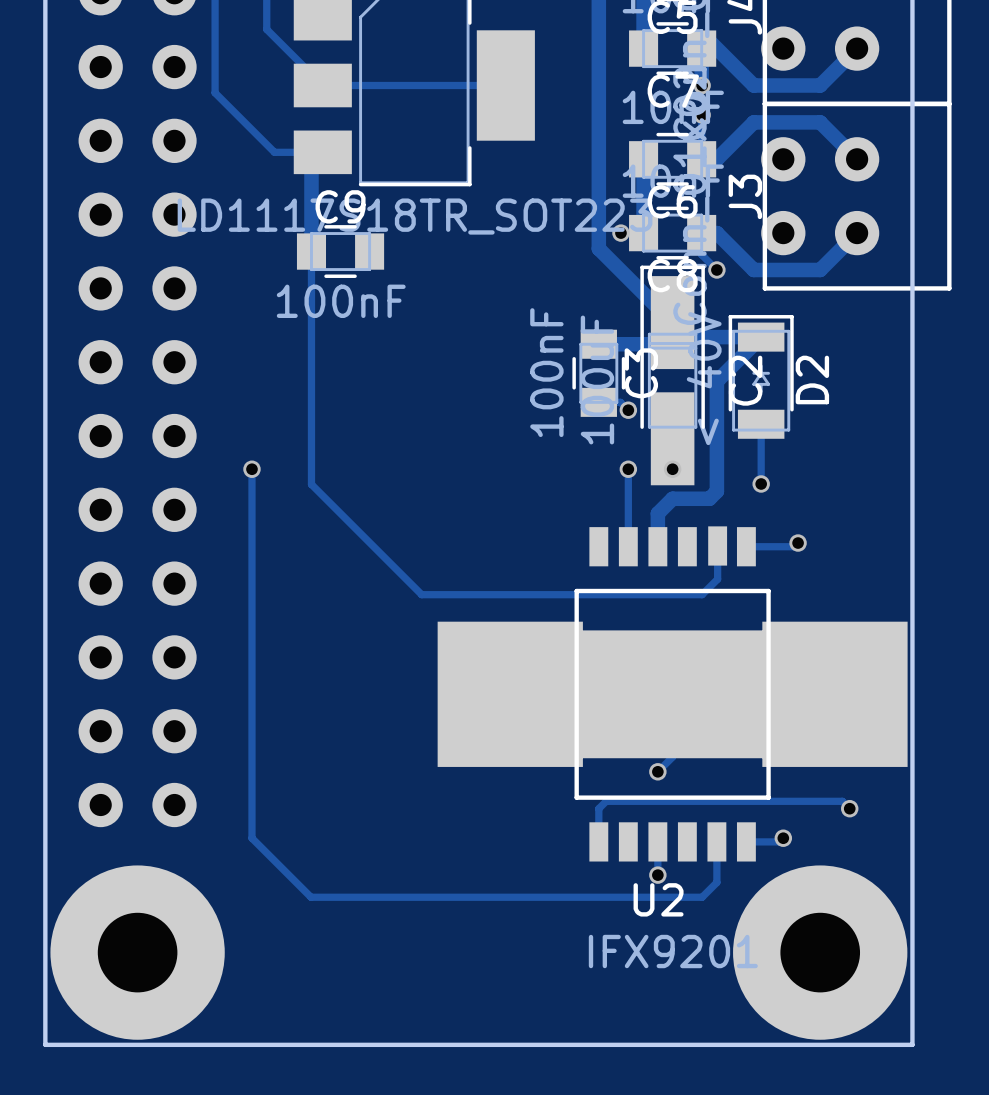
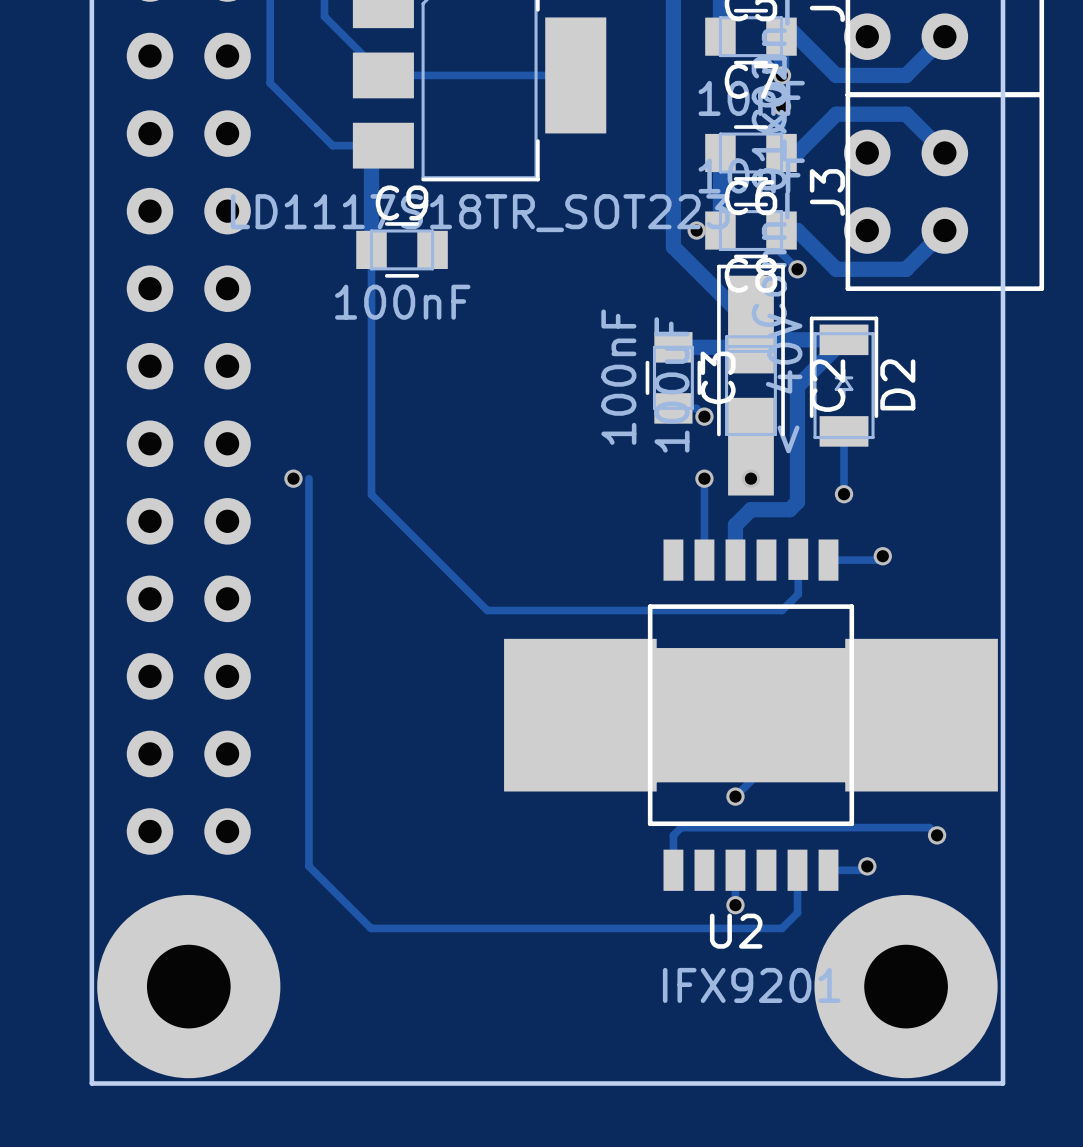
via position: (251, 469) -> (293, 478)

